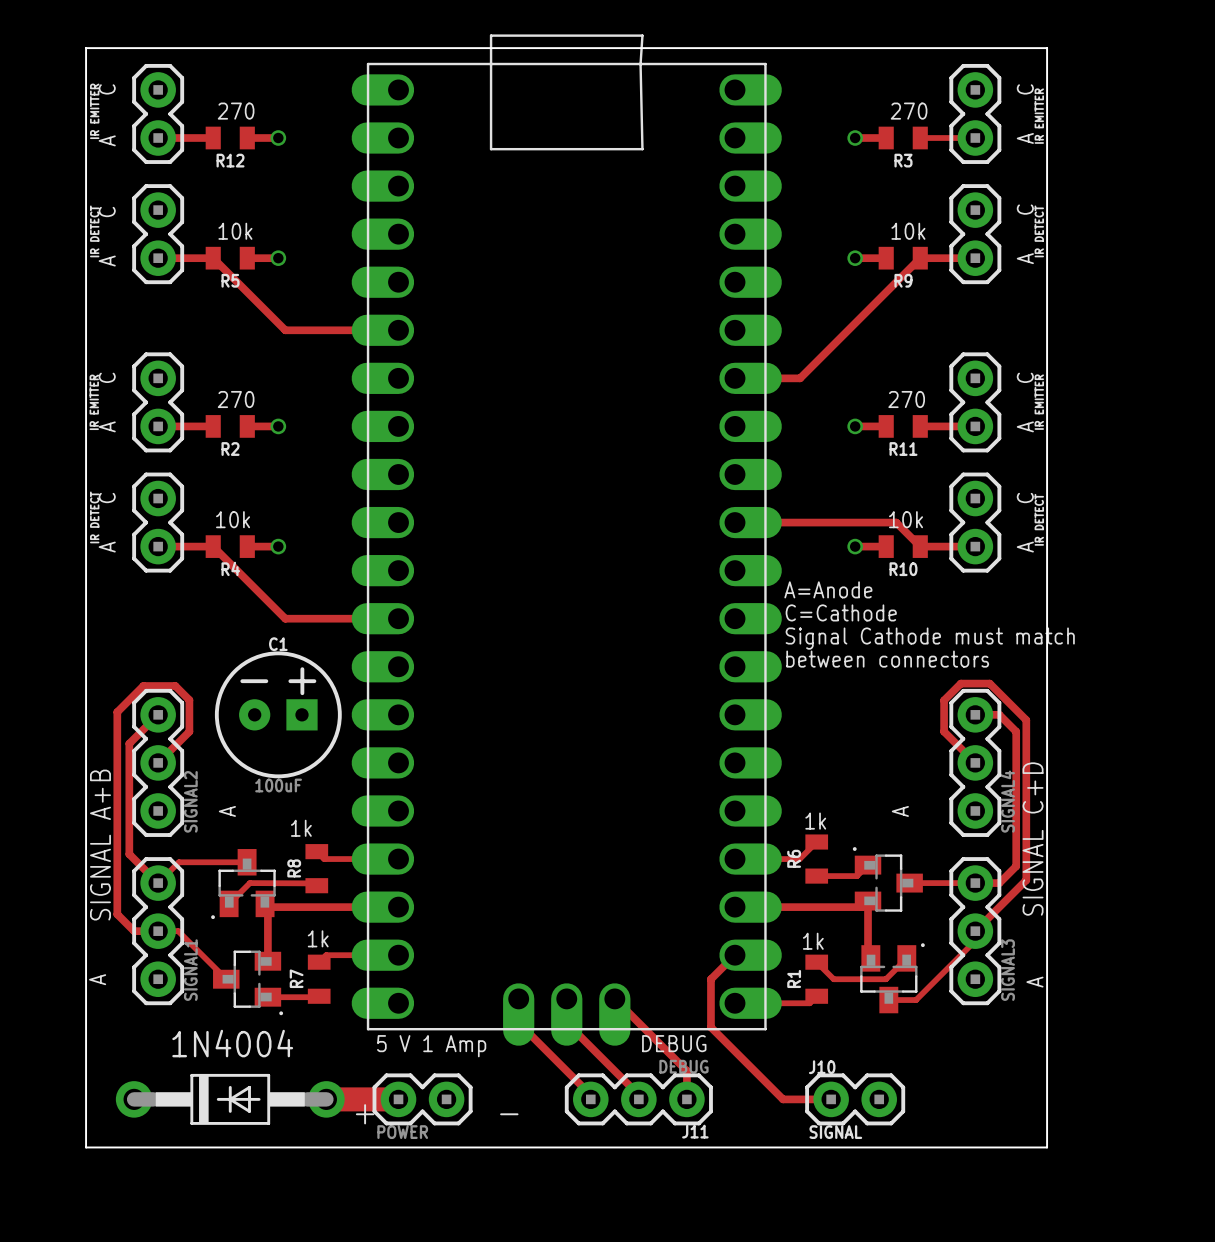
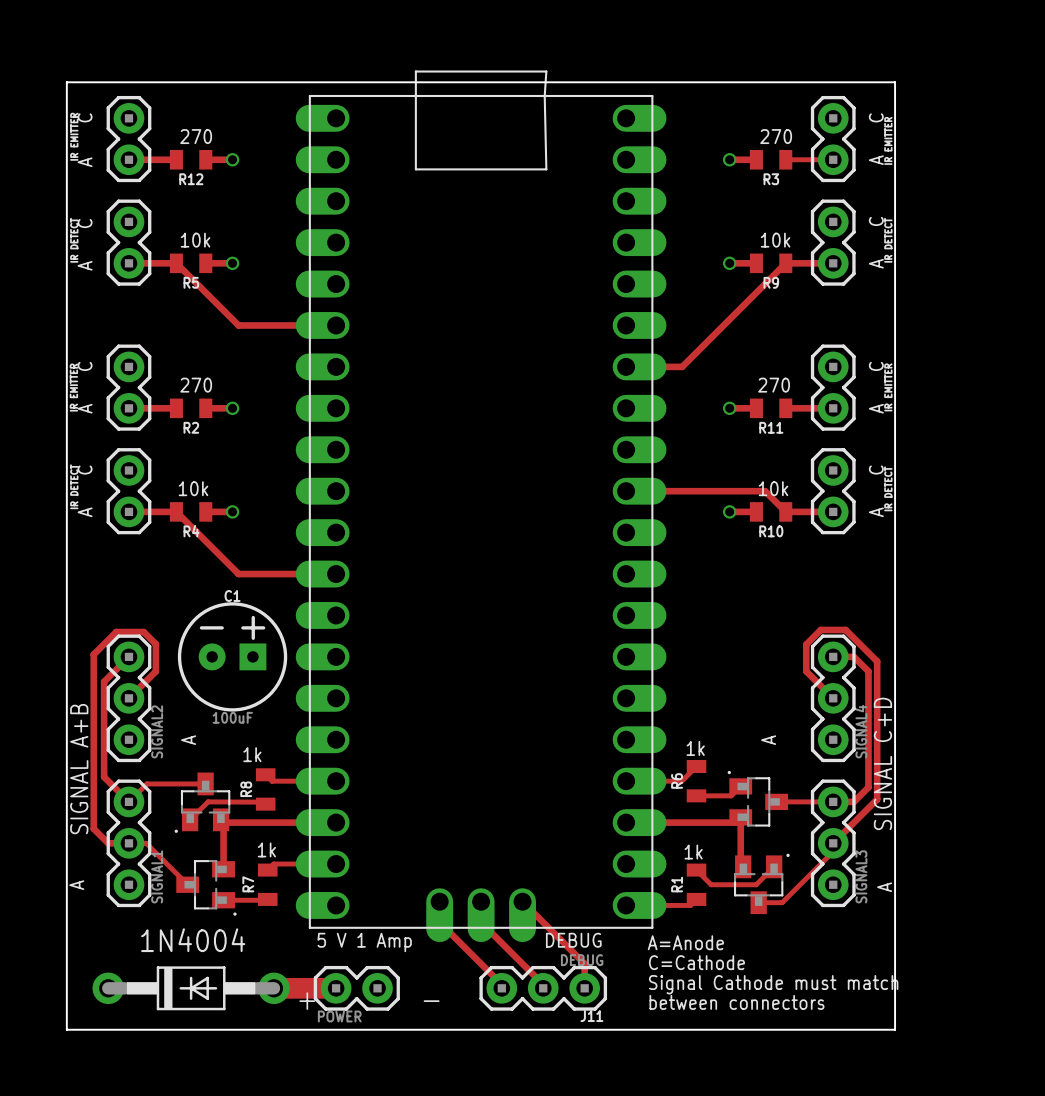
text position: A=Anode (828, 589) -> A=Anode (685, 942)
text position: C=Cathode (841, 612) -> C=Cathode (696, 962)
text position: Signal Cathode must match (930, 638) -> Signal Cathode must match (773, 984)
text position: between connectors (887, 659) -> between connectors (737, 1002)
track: (735, 955) (710, 979) (710, 1027) (783, 1099) (831, 1099) -> none
J10: SIGNAL (855, 1099) -> none

